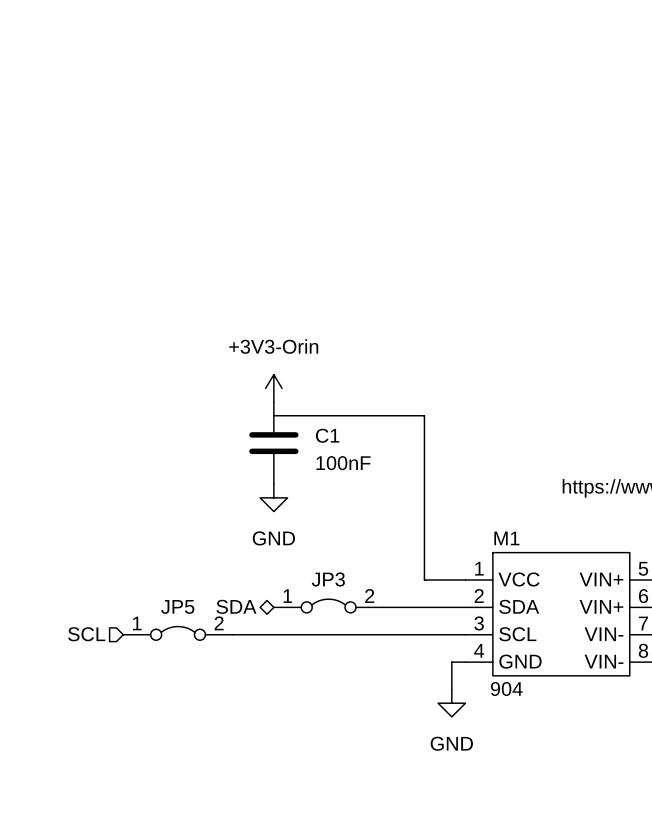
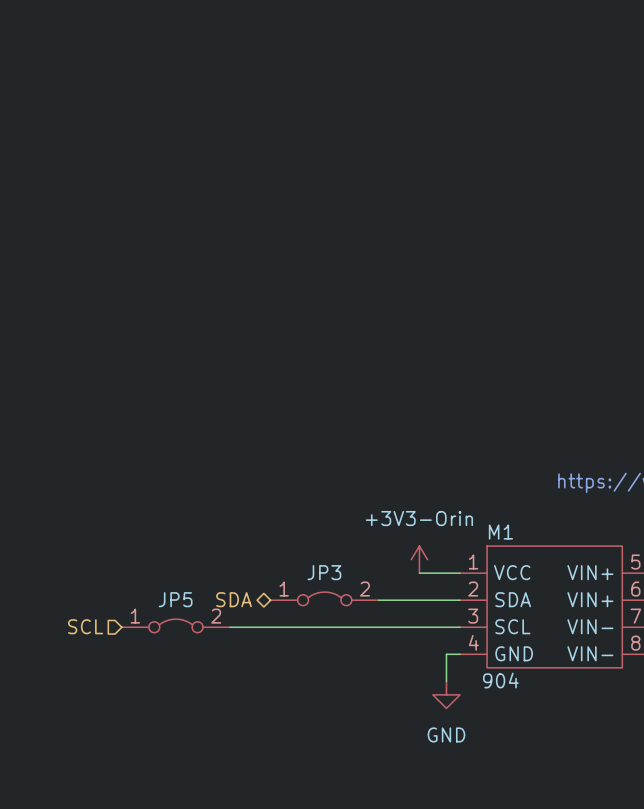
power symbol position: +3V3-Orin (273, 388) -> +3V3-Orin (419, 559)
wire: (273, 415) (424, 415) (424, 580) -> none
C1: 100nF (273, 443) -> none
power symbol: GND (273, 497) -> none

